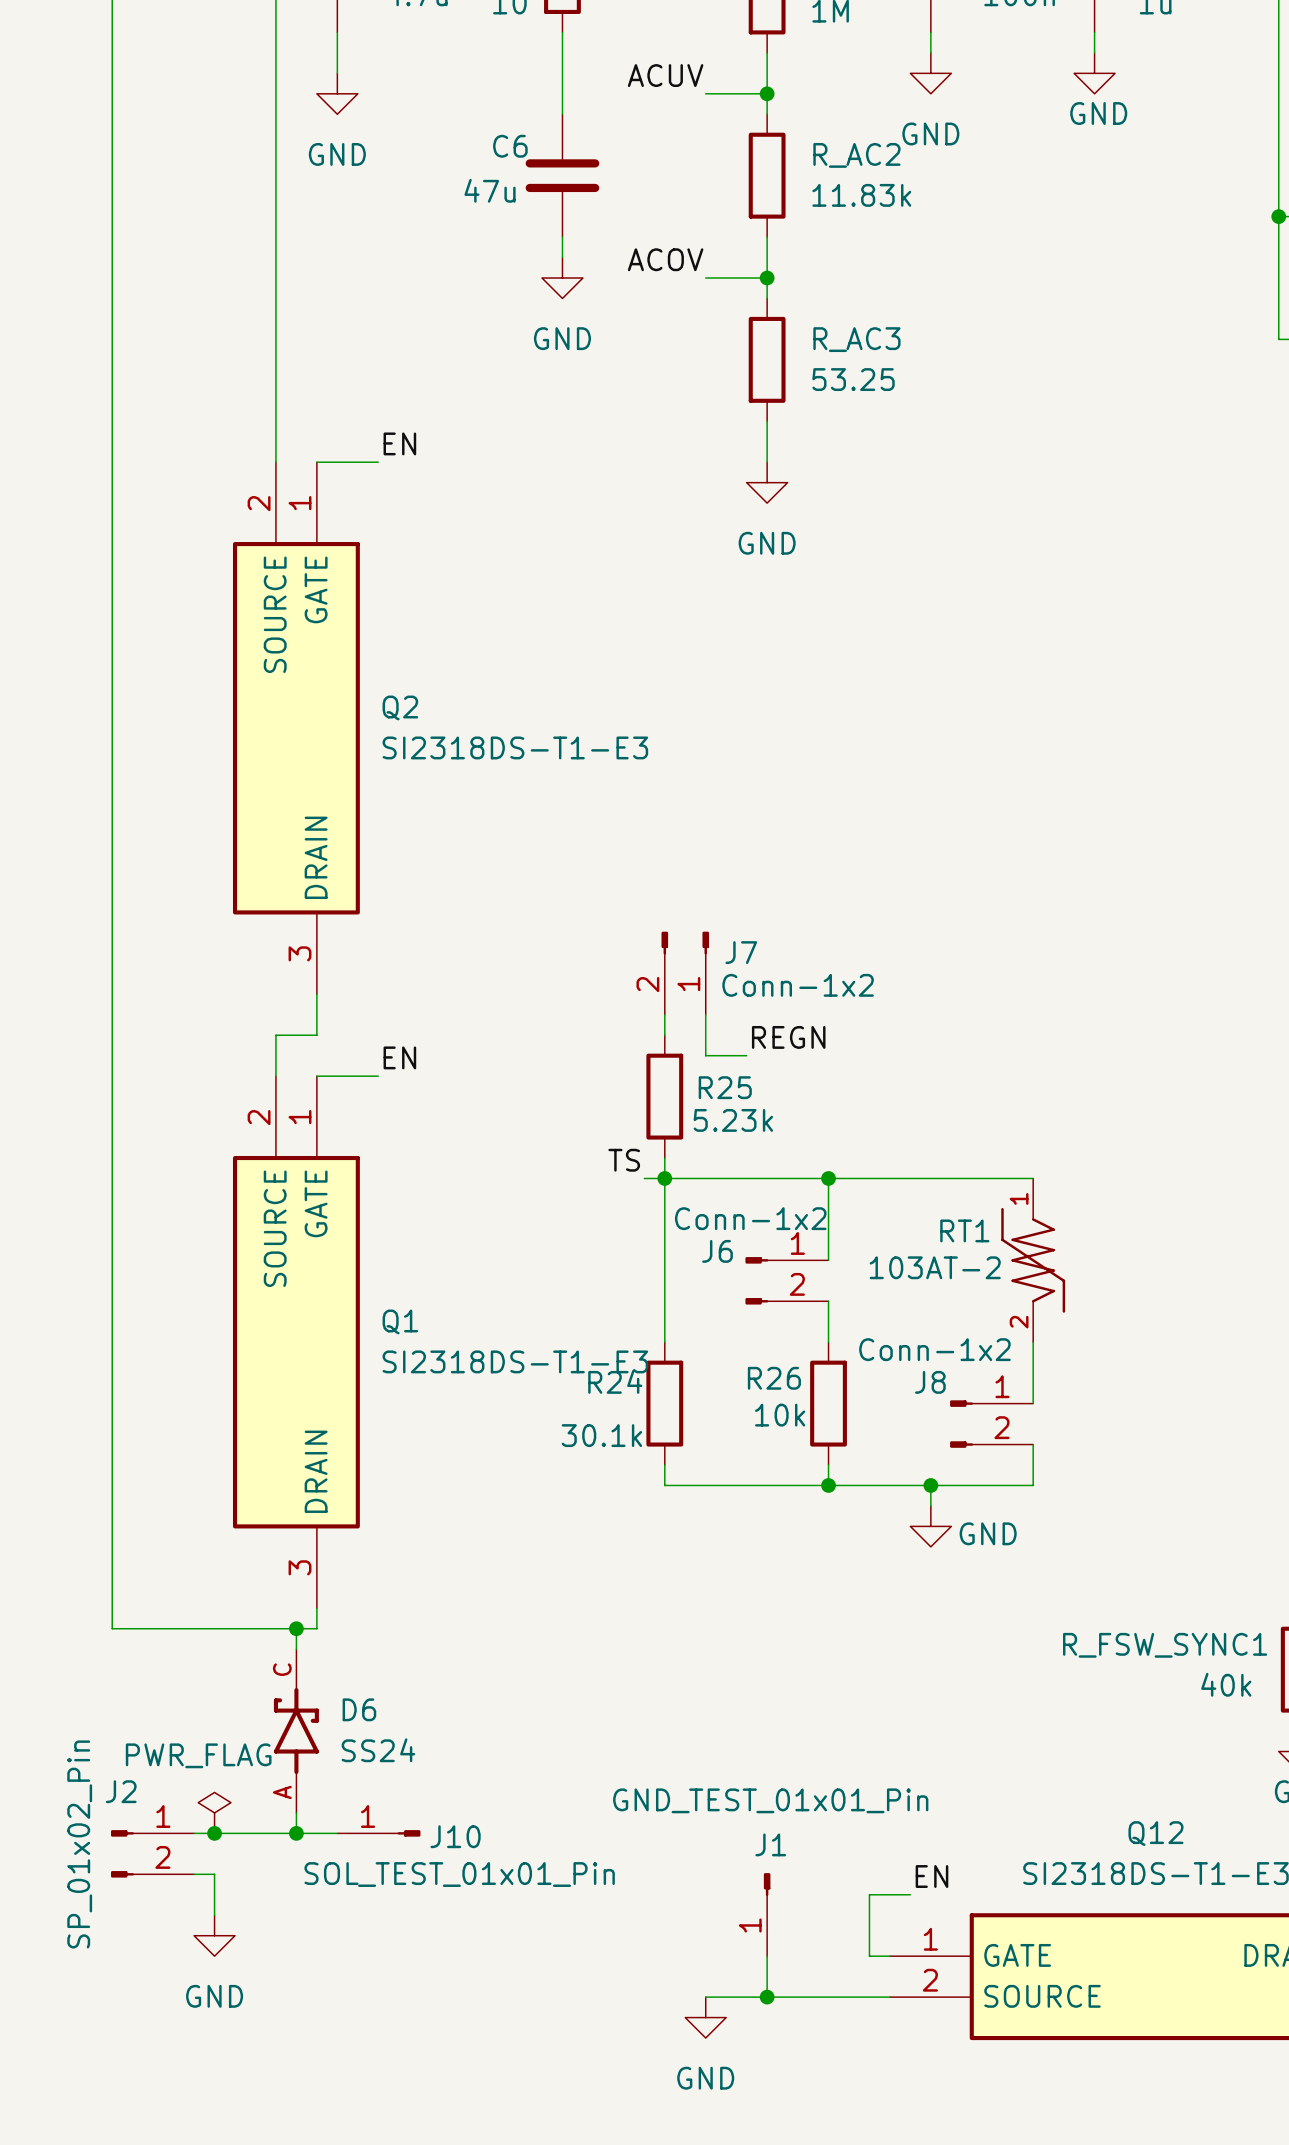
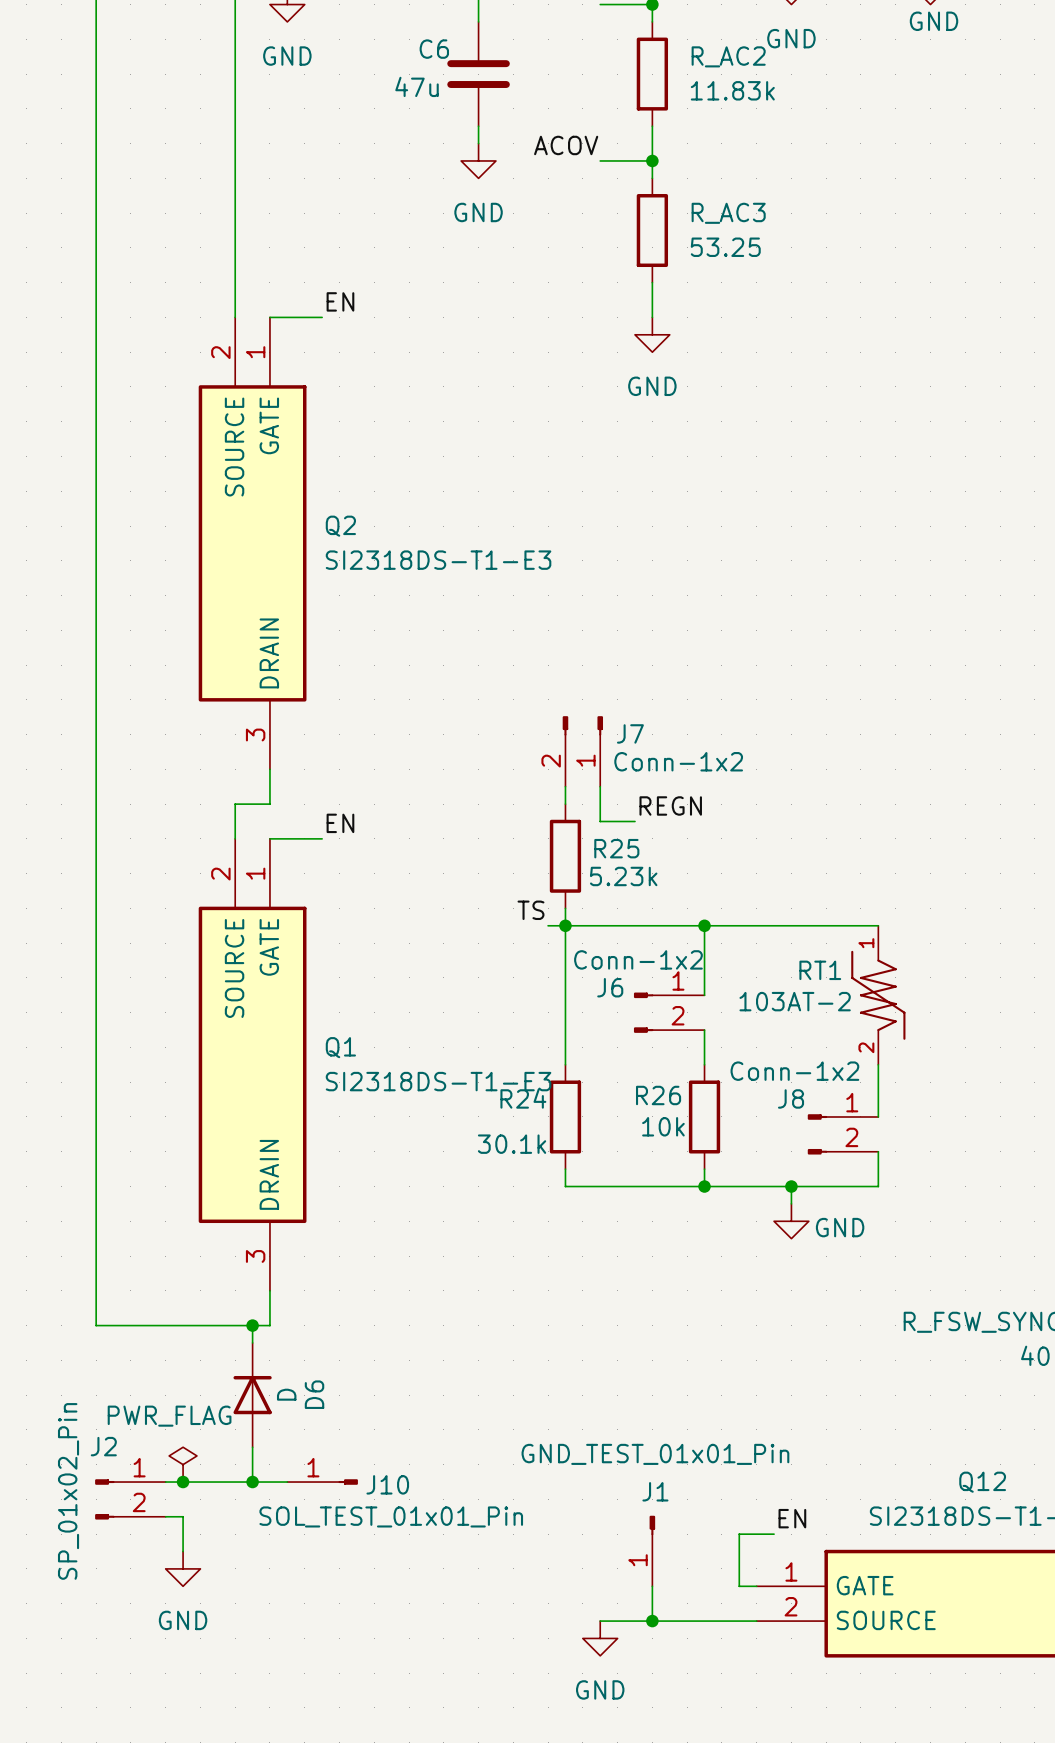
wire: (112, 1628) (316, 1628) -> (96, 1308) (96, 1325) (269, 1325) (269, 1308)
junction position: (296, 1628) -> (252, 1325)
D6 symbol: [273, 1649, 319, 1813] -> [233, 1342, 272, 1448]
D6 value: SS24 (378, 1750) -> D (286, 1394)

